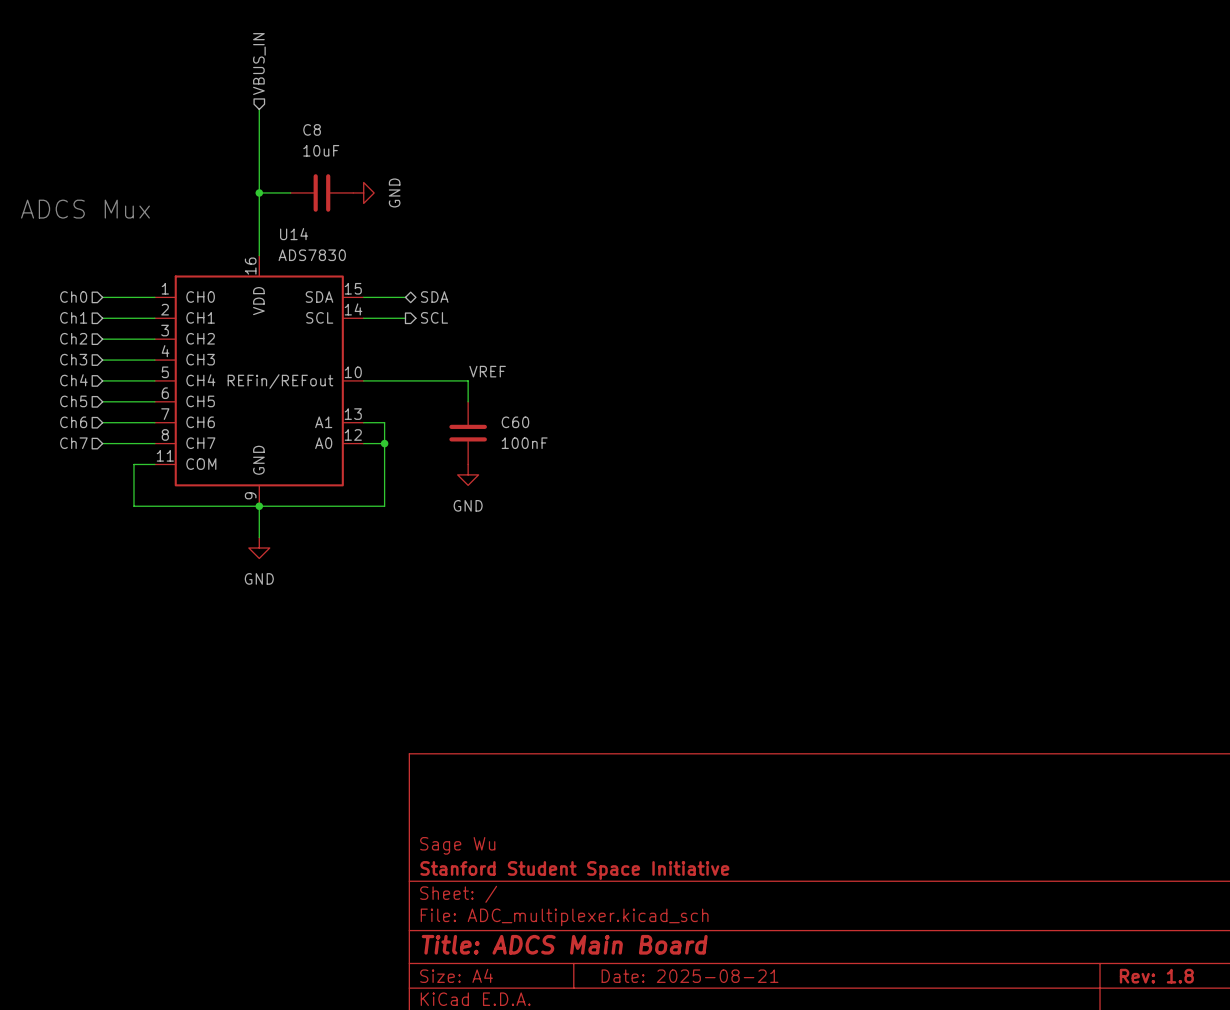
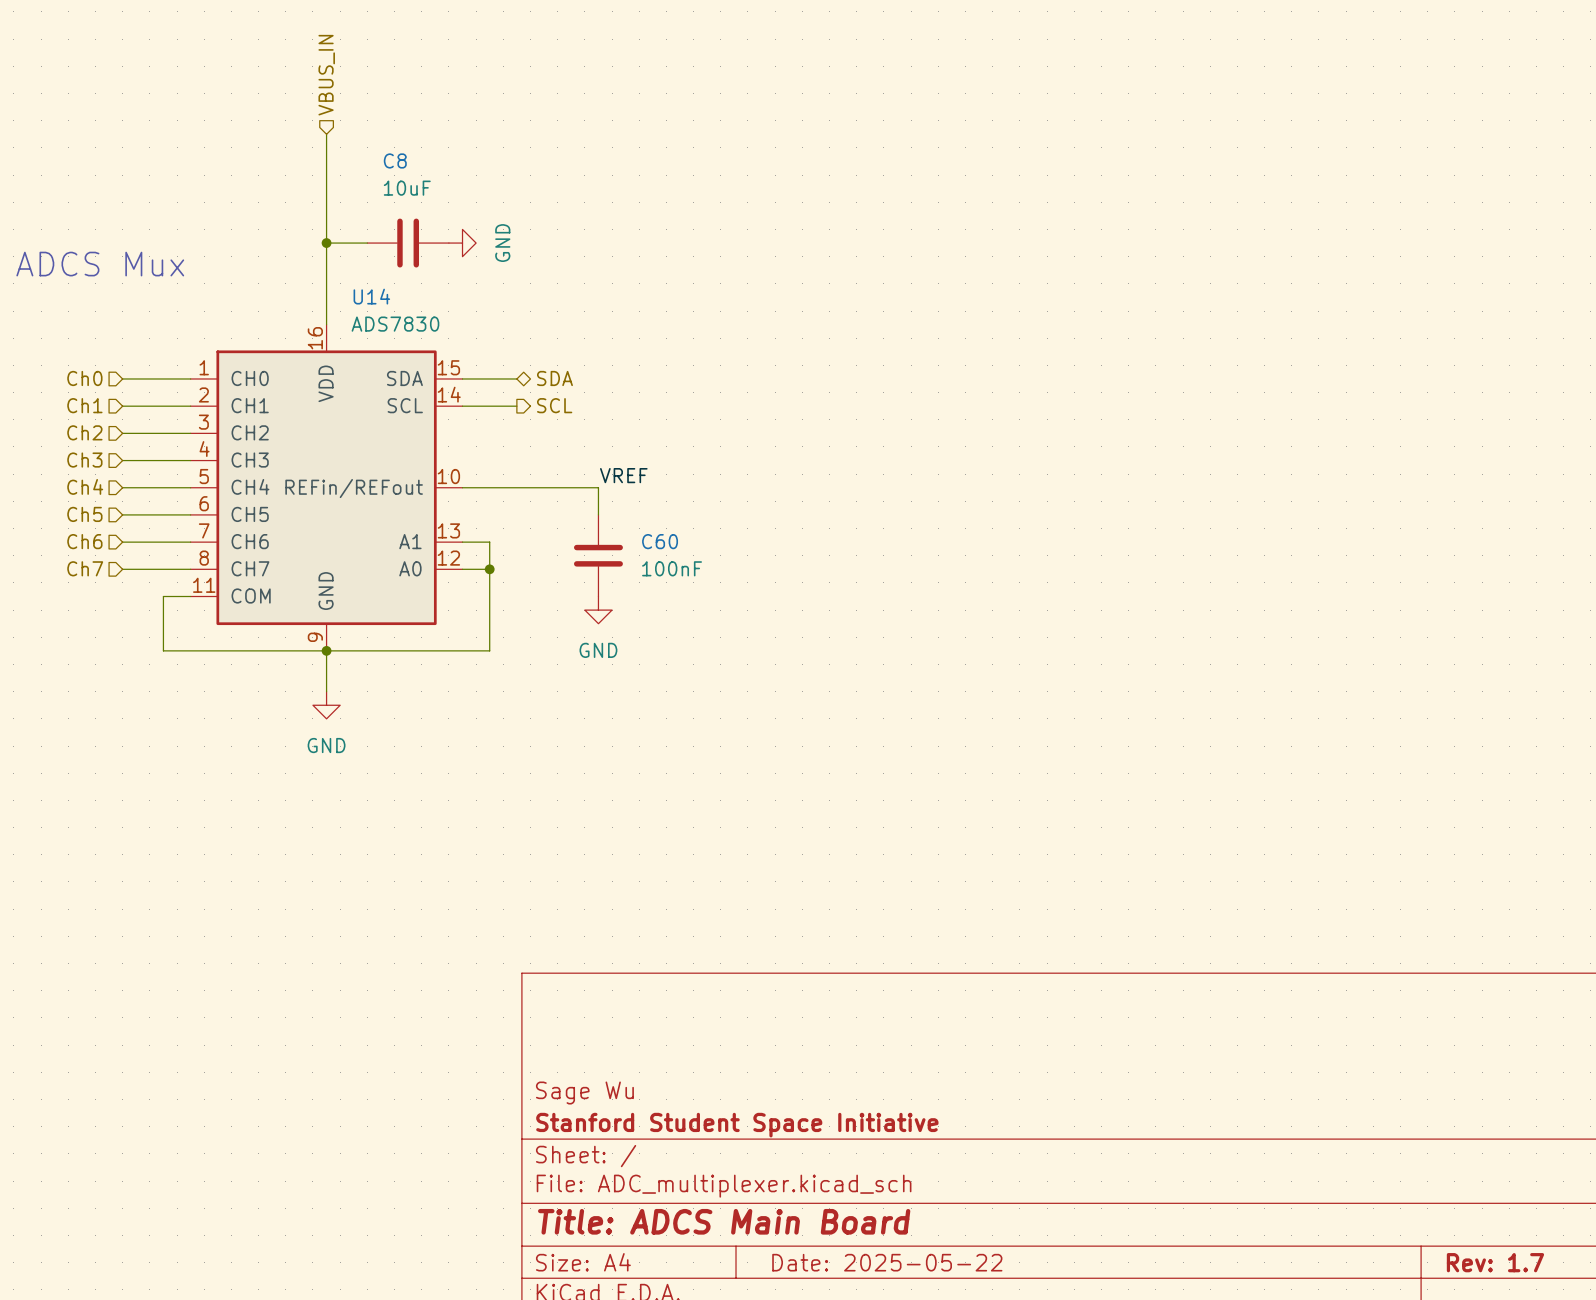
title block: Date: 2025-08-21 (690, 976) -> Date: 2025-05-22 (887, 1262)
title block: Rev: 1.8 (1156, 976) -> Rev: 1.7 (1495, 1262)

